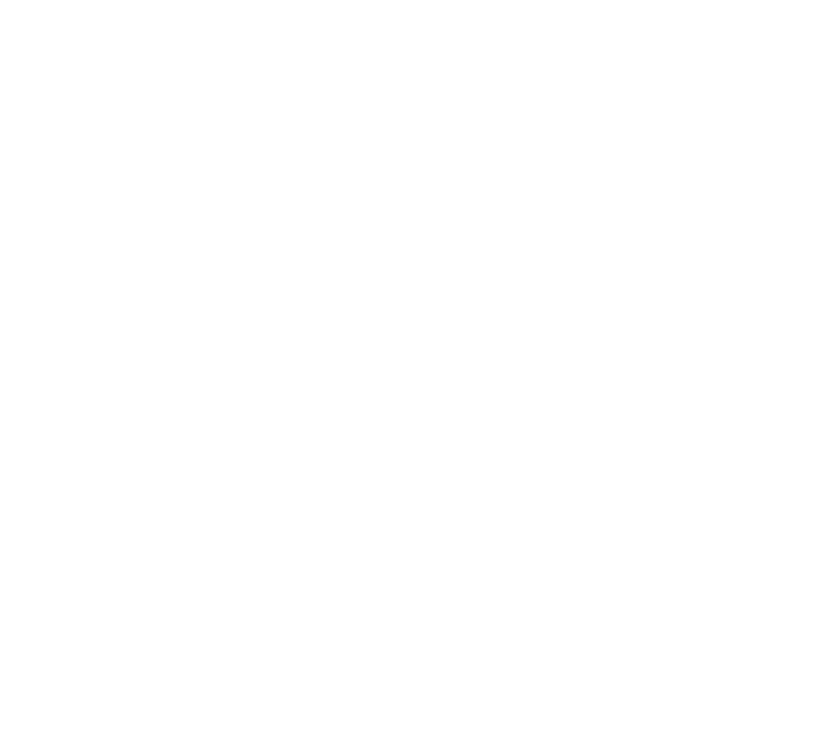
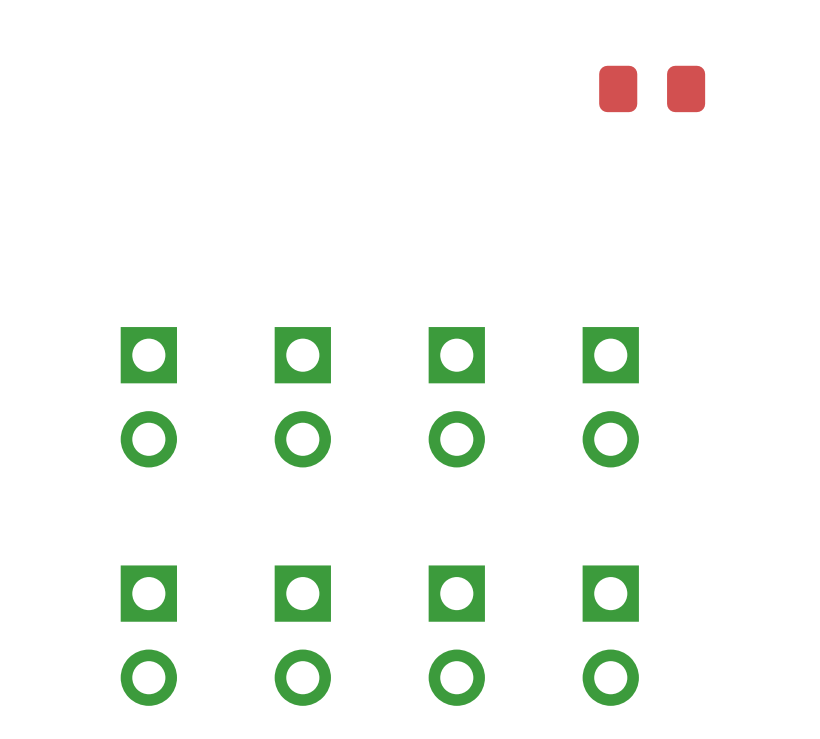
part: none -> (652, 88)
part: none -> (148, 397)
part: none -> (302, 397)
part: none -> (456, 397)
part: none -> (610, 397)
part: none -> (148, 635)
part: none -> (302, 635)
part: none -> (456, 635)
part: none -> (610, 635)

